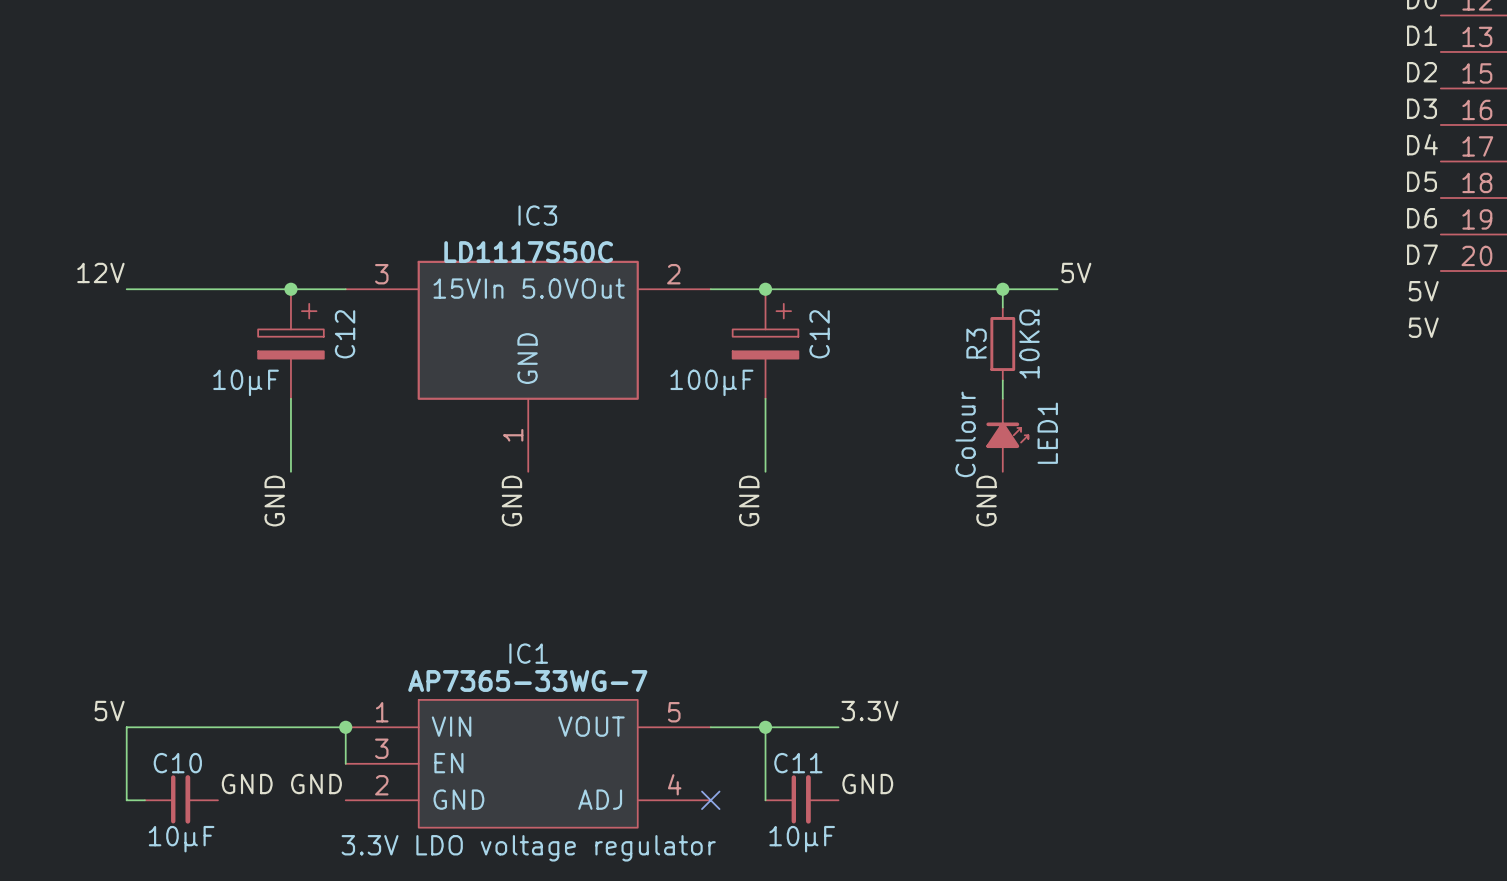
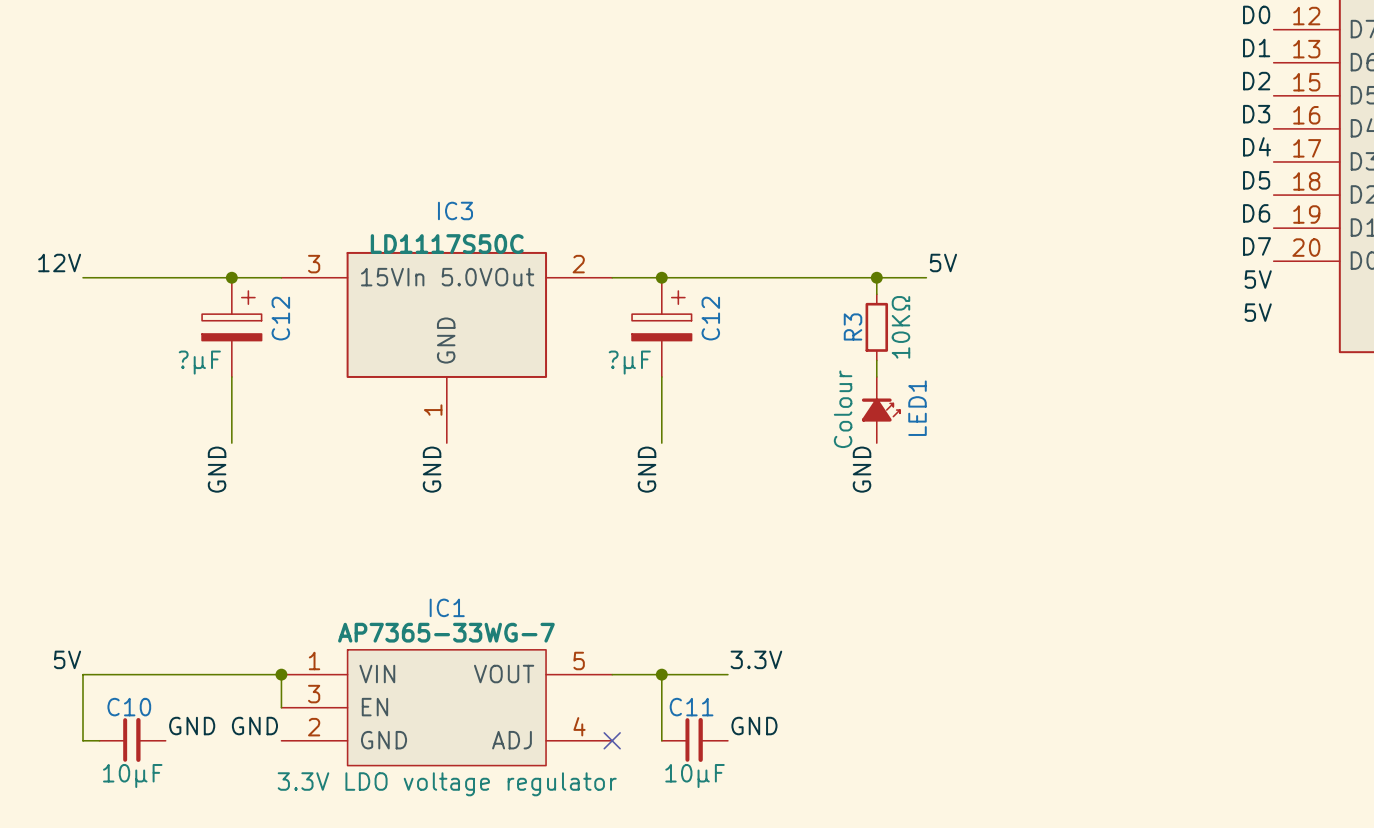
C12 text: 10μF (246, 382) -> ?μF (199, 362)
C12 text: 100μF (711, 382) -> ?μF (629, 362)

